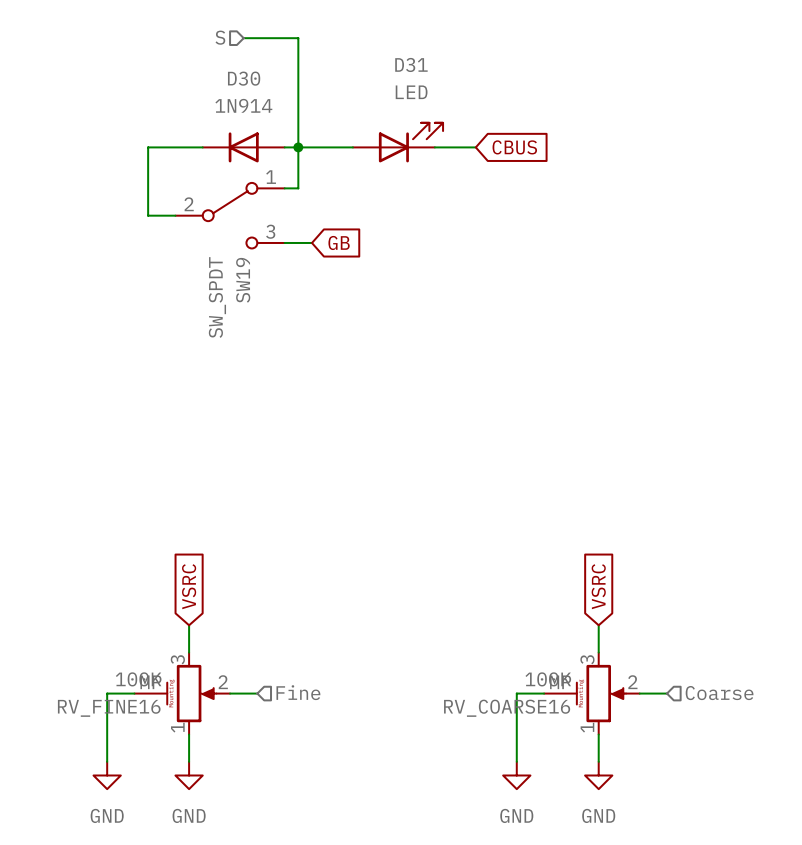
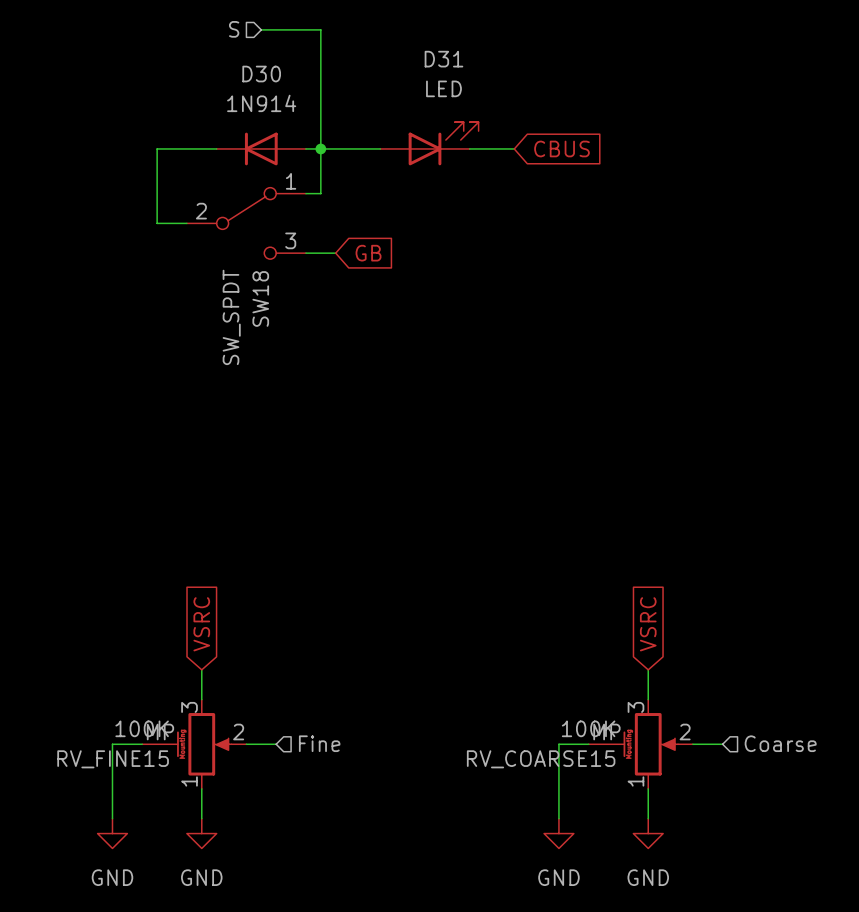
SW19 name: SW19 (243, 280) -> SW18 (260, 298)
RV_FINE16 name: RV_FINE16 (109, 708) -> RV_FINE15 (113, 759)
RV_COARSE16 name: RV_COARSE16 (507, 708) -> RV_COARSE15 (541, 759)

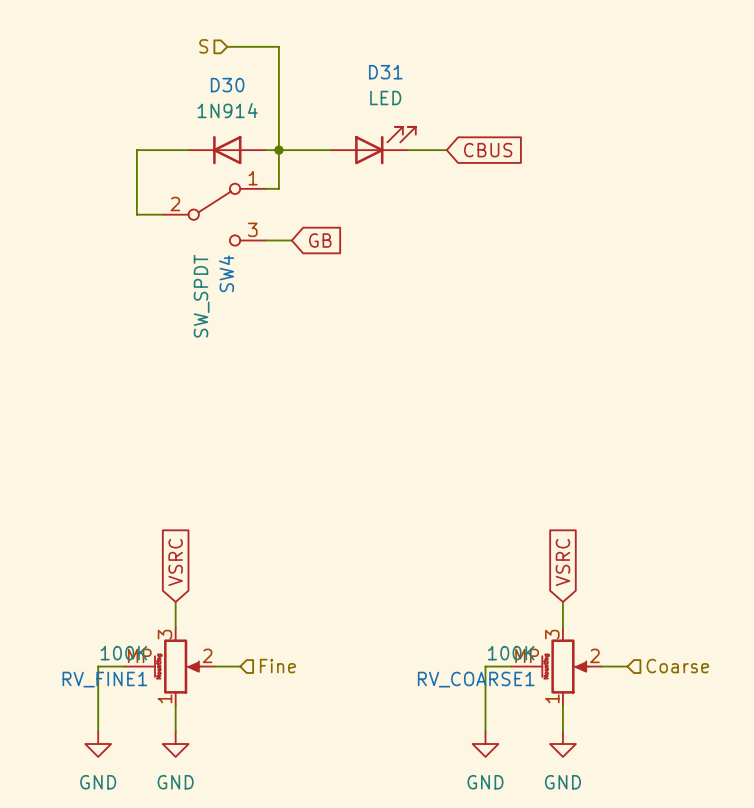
SW18 name: SW18 (260, 298) -> SW4 (226, 273)
RV_FINE15 name: RV_FINE15 (113, 759) -> RV_FINE1 (104, 679)
RV_COARSE15 name: RV_COARSE15 (541, 759) -> RV_COARSE1 (476, 679)

